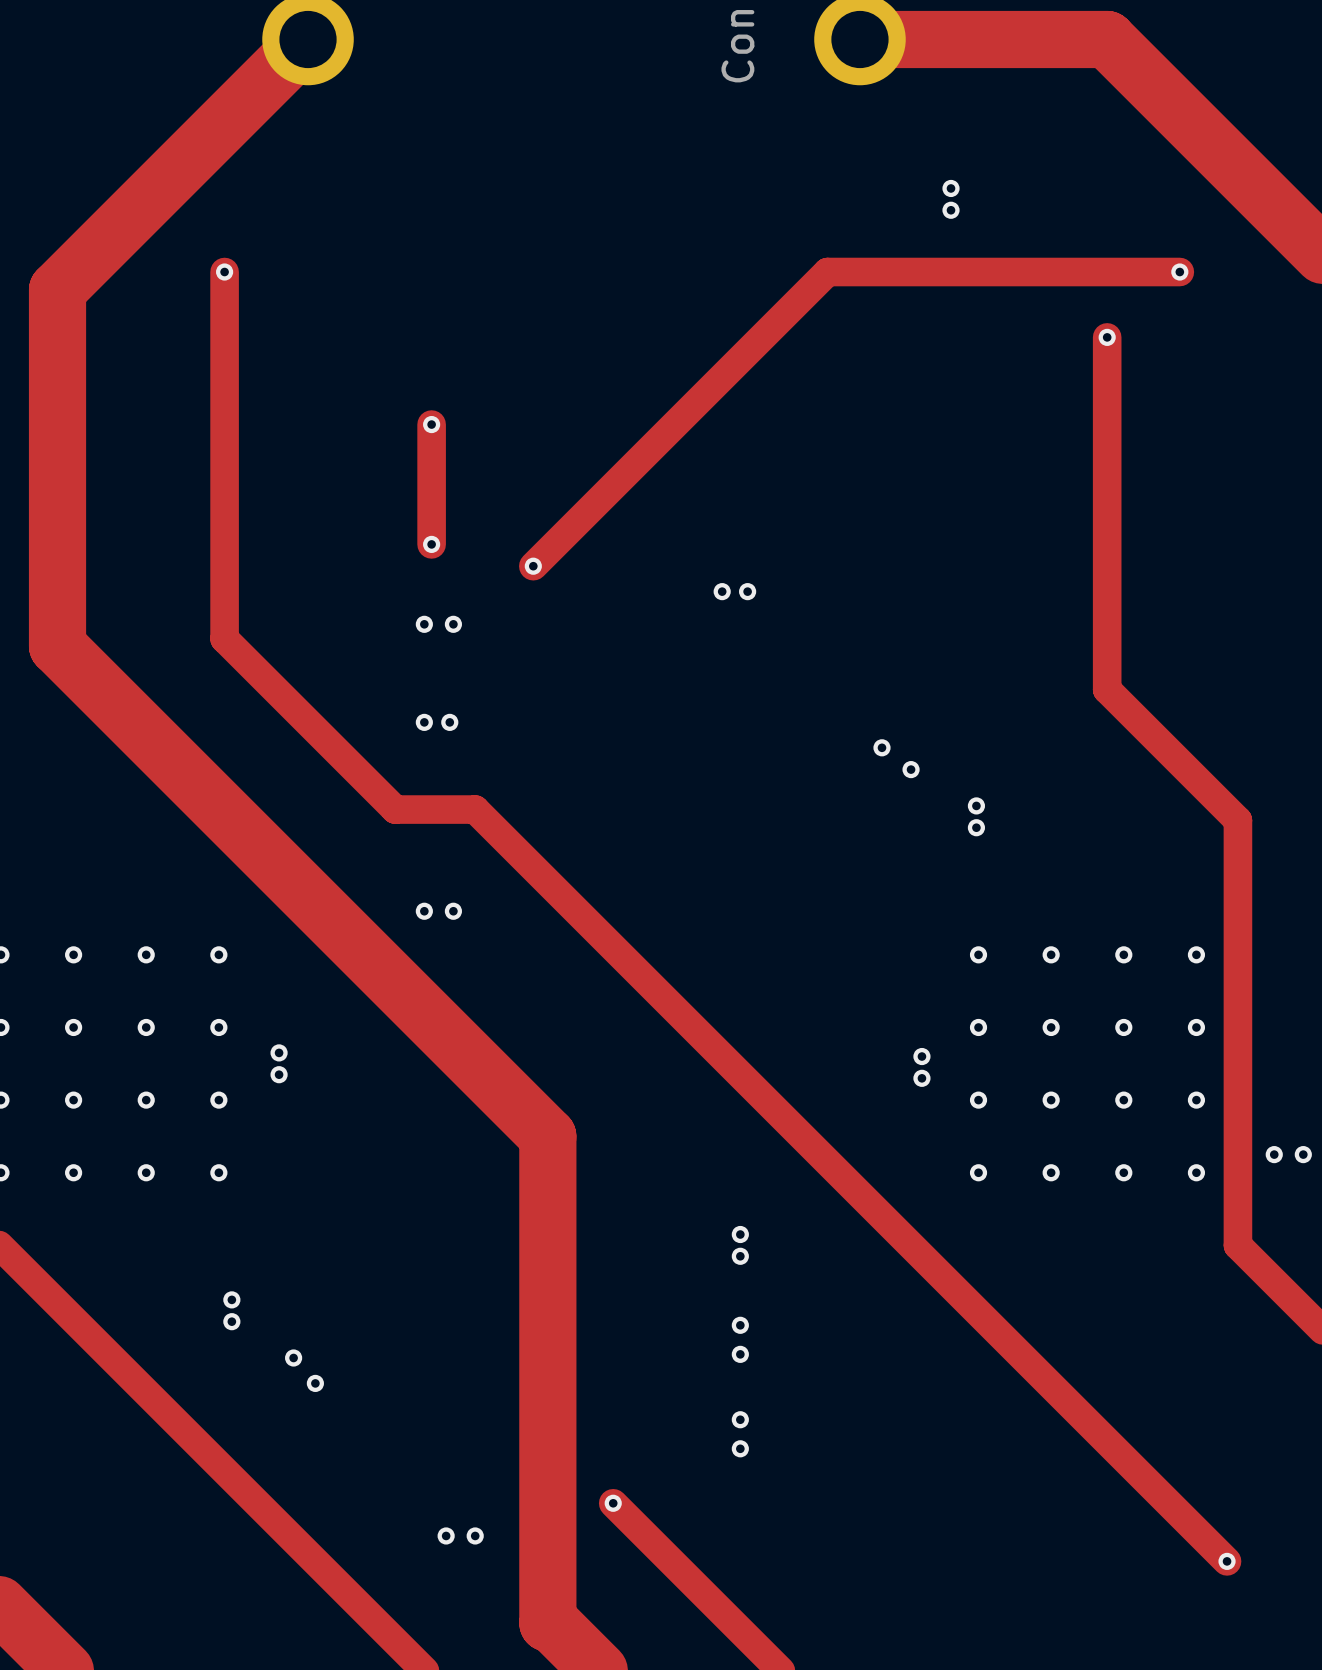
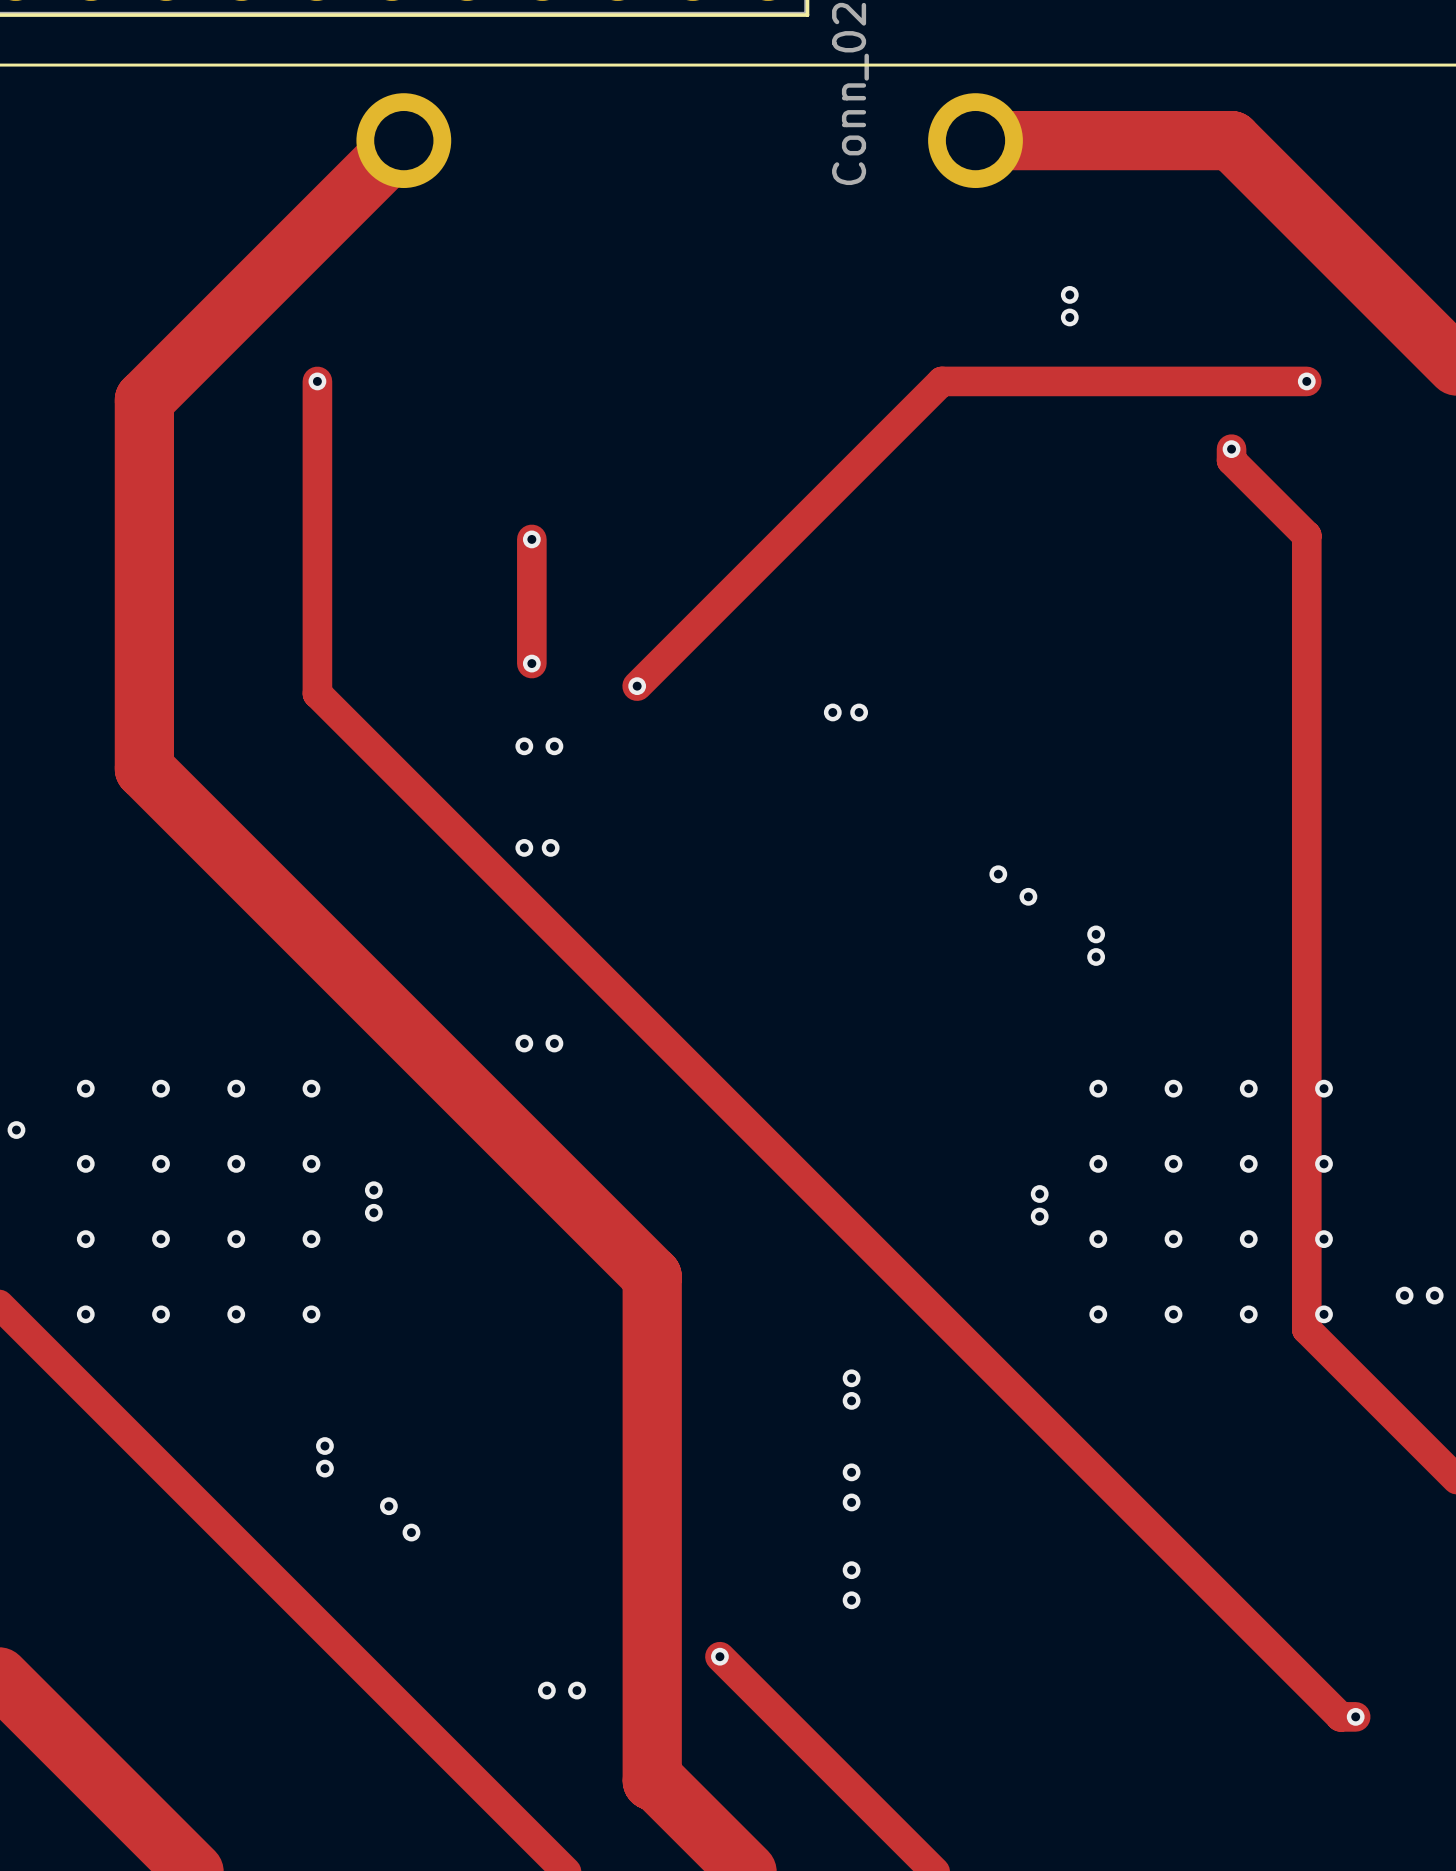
track: (1107, 348) (1107, 689) (1237, 820) (1237, 1245) -> (1231, 460) (1306, 535) (1306, 1329) (1366, 1389)
track: (224, 573) (224, 638) (395, 809) (475, 809) (1227, 1561) -> (317, 693) (1340, 1716) (1355, 1716)

